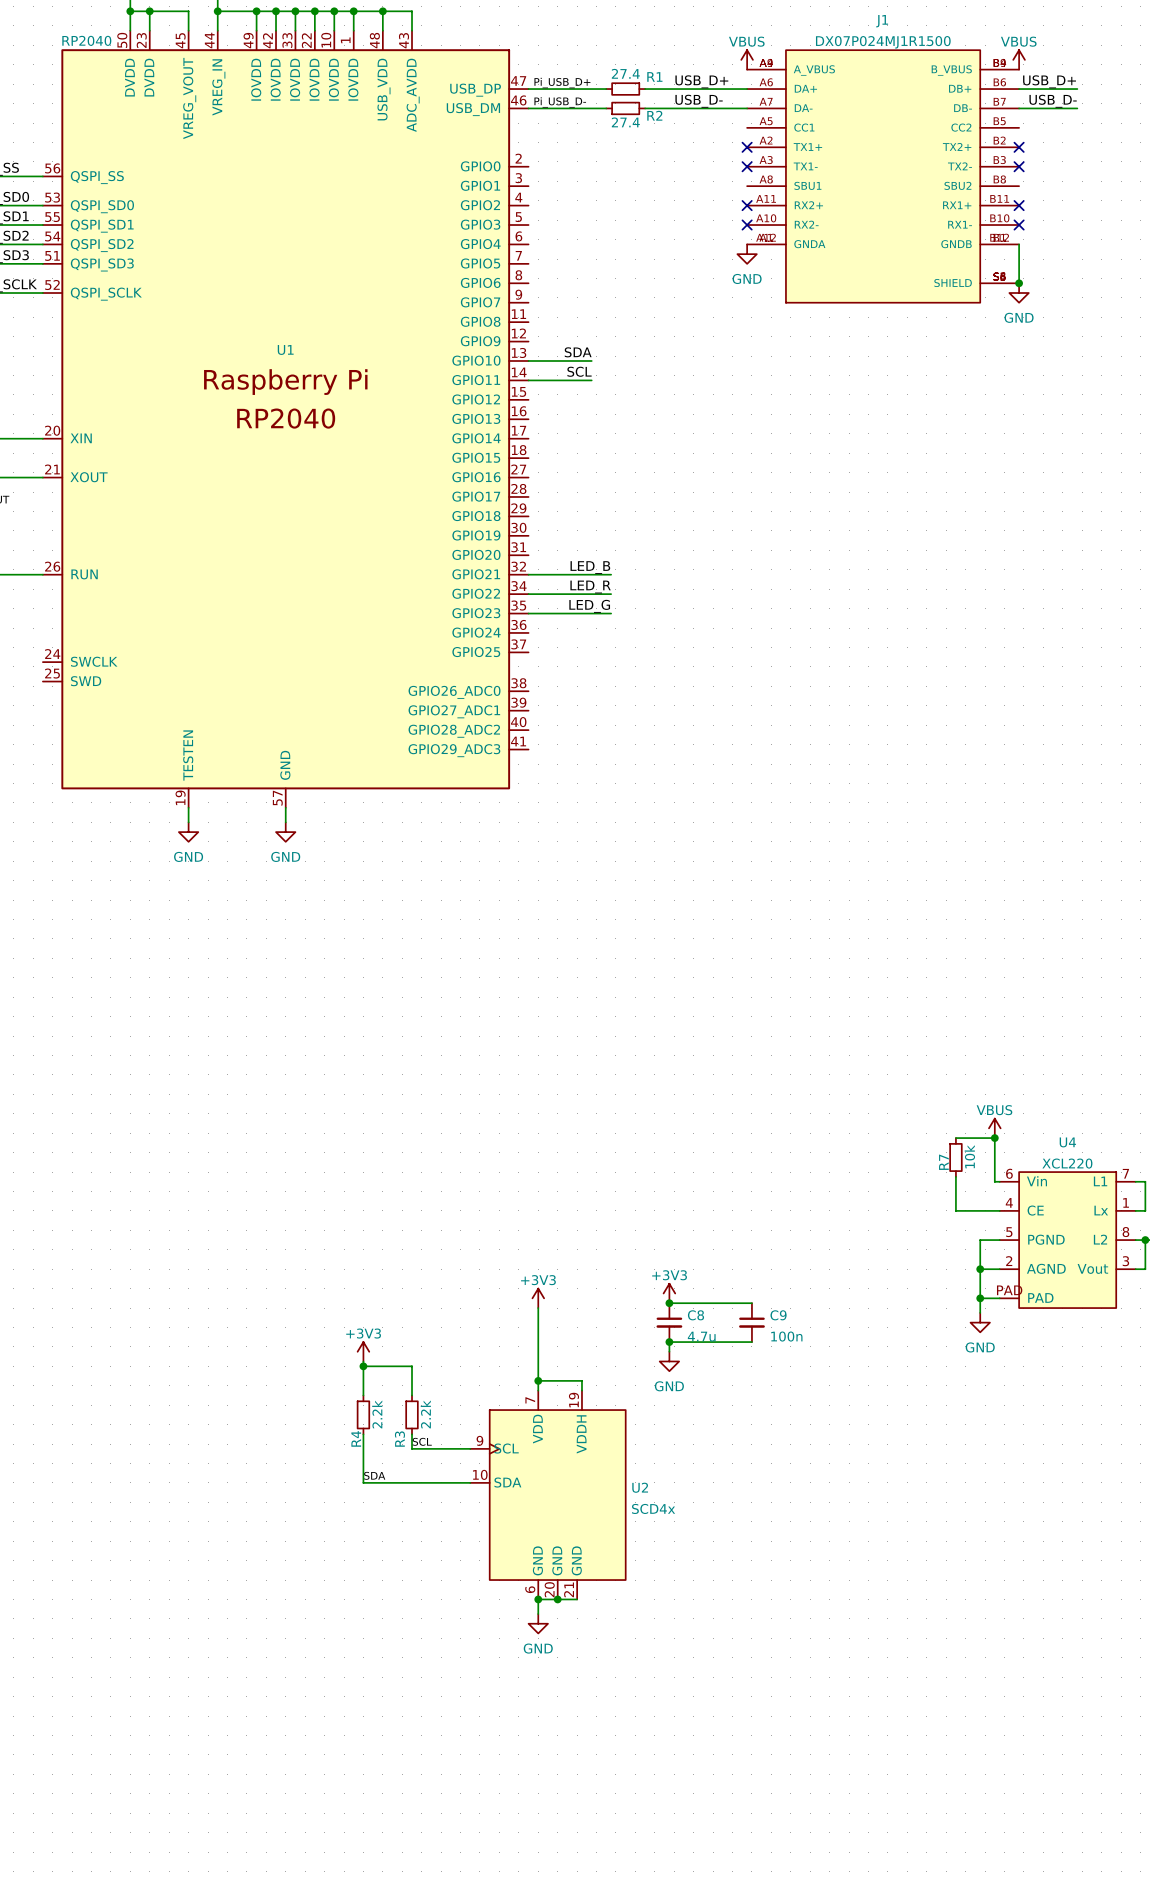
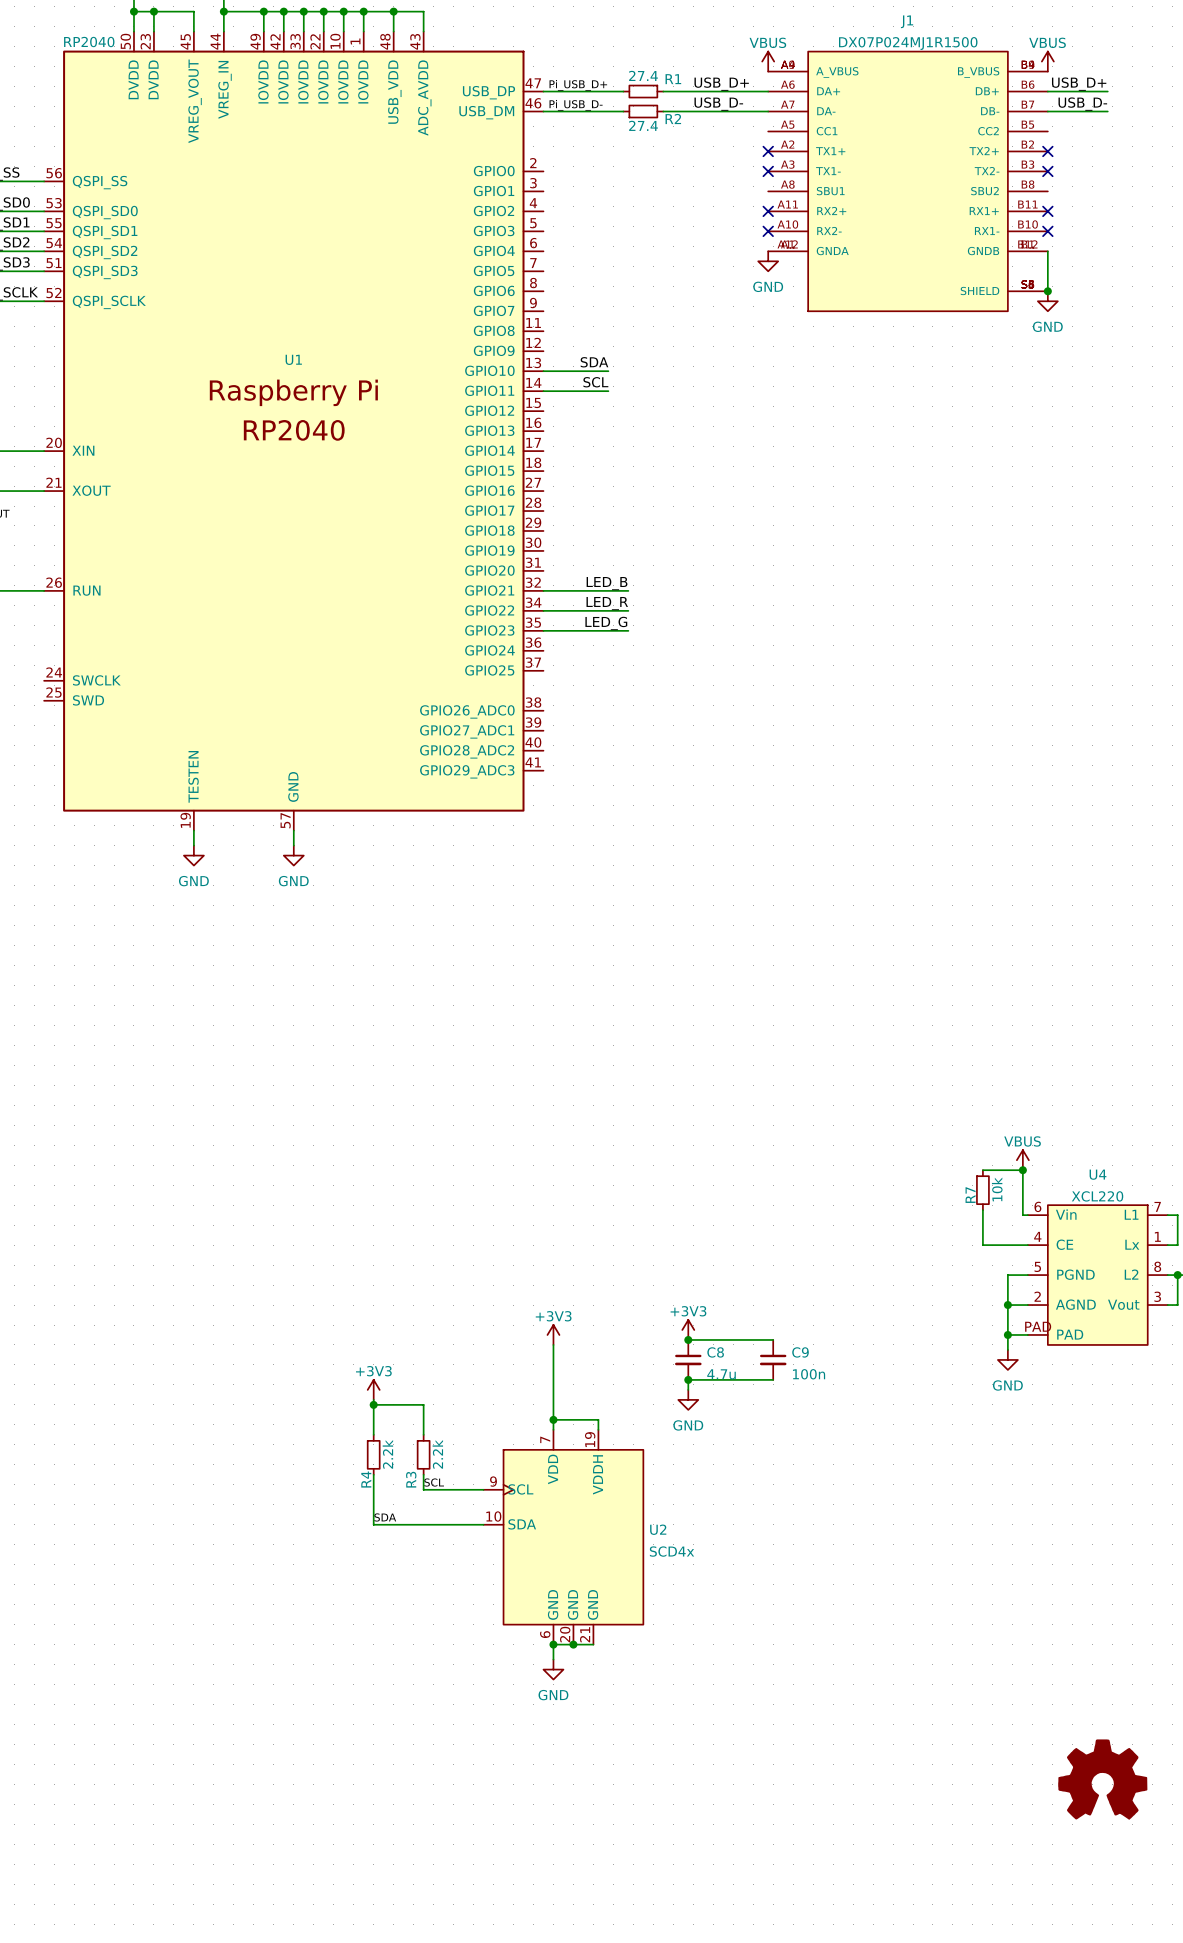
part: none -> (1102, 1779)

